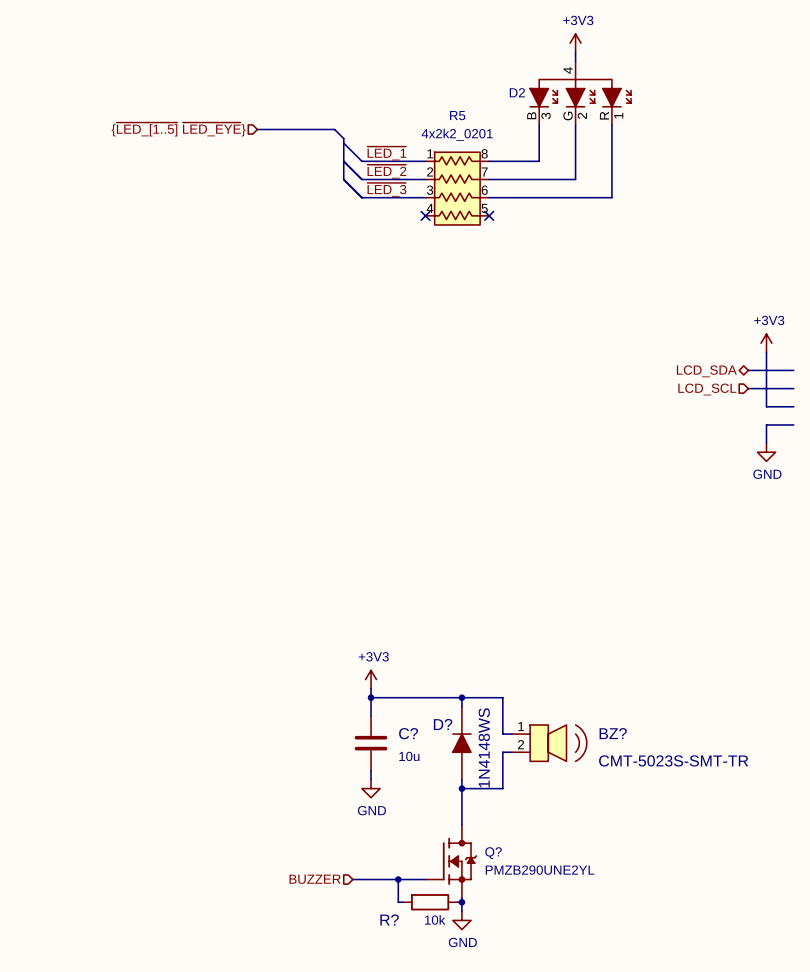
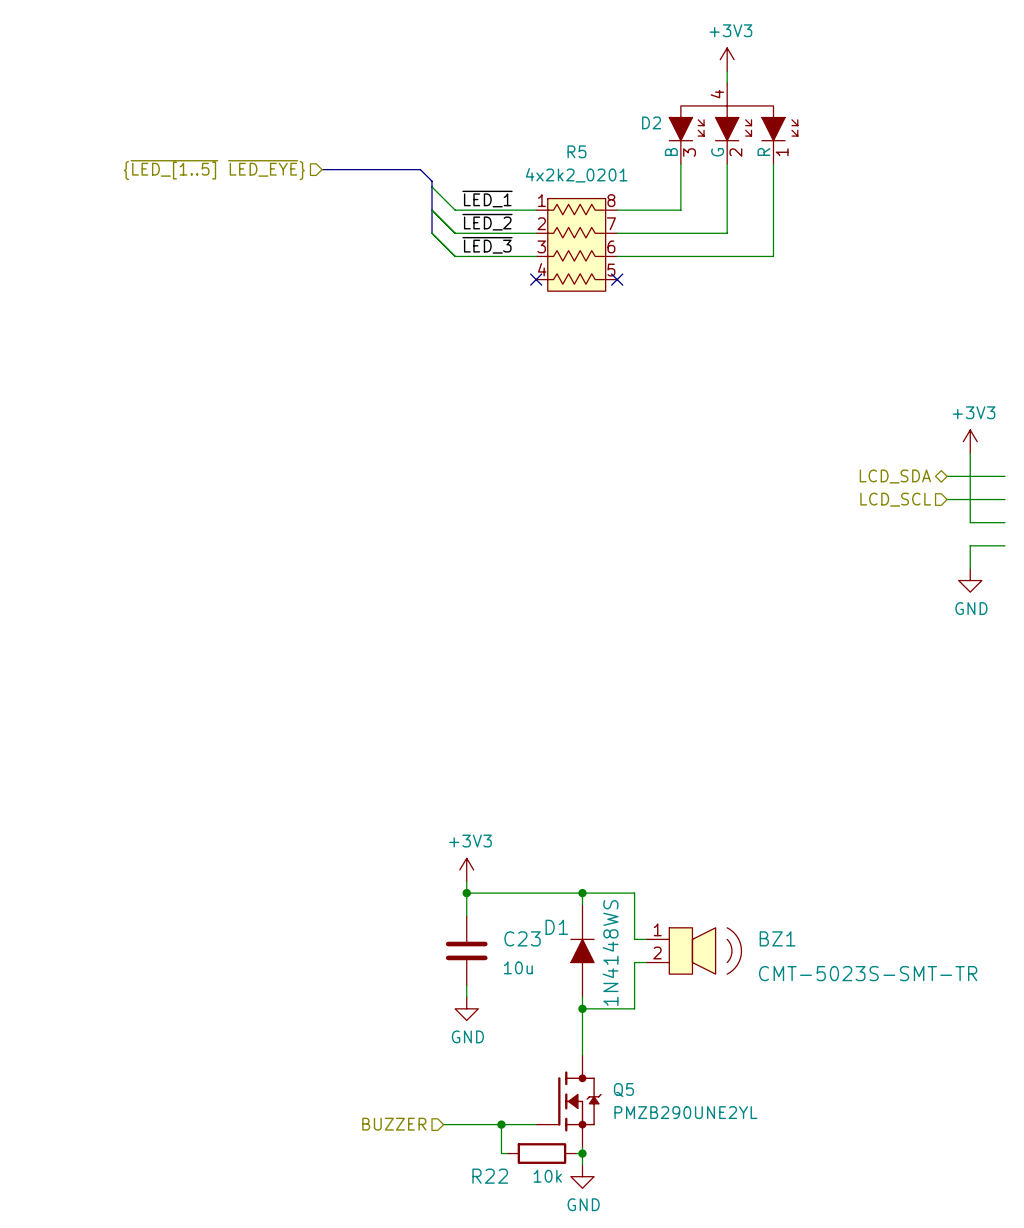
D? name: D? (443, 724) -> D1 (556, 927)
C? name: C? (408, 733) -> C23 (522, 938)
BZ? name: BZ? (613, 733) -> BZ1 (777, 938)
Q? name: Q? (493, 853) -> Q5 (623, 1089)
R? name: R? (389, 919) -> R22 (490, 1176)

